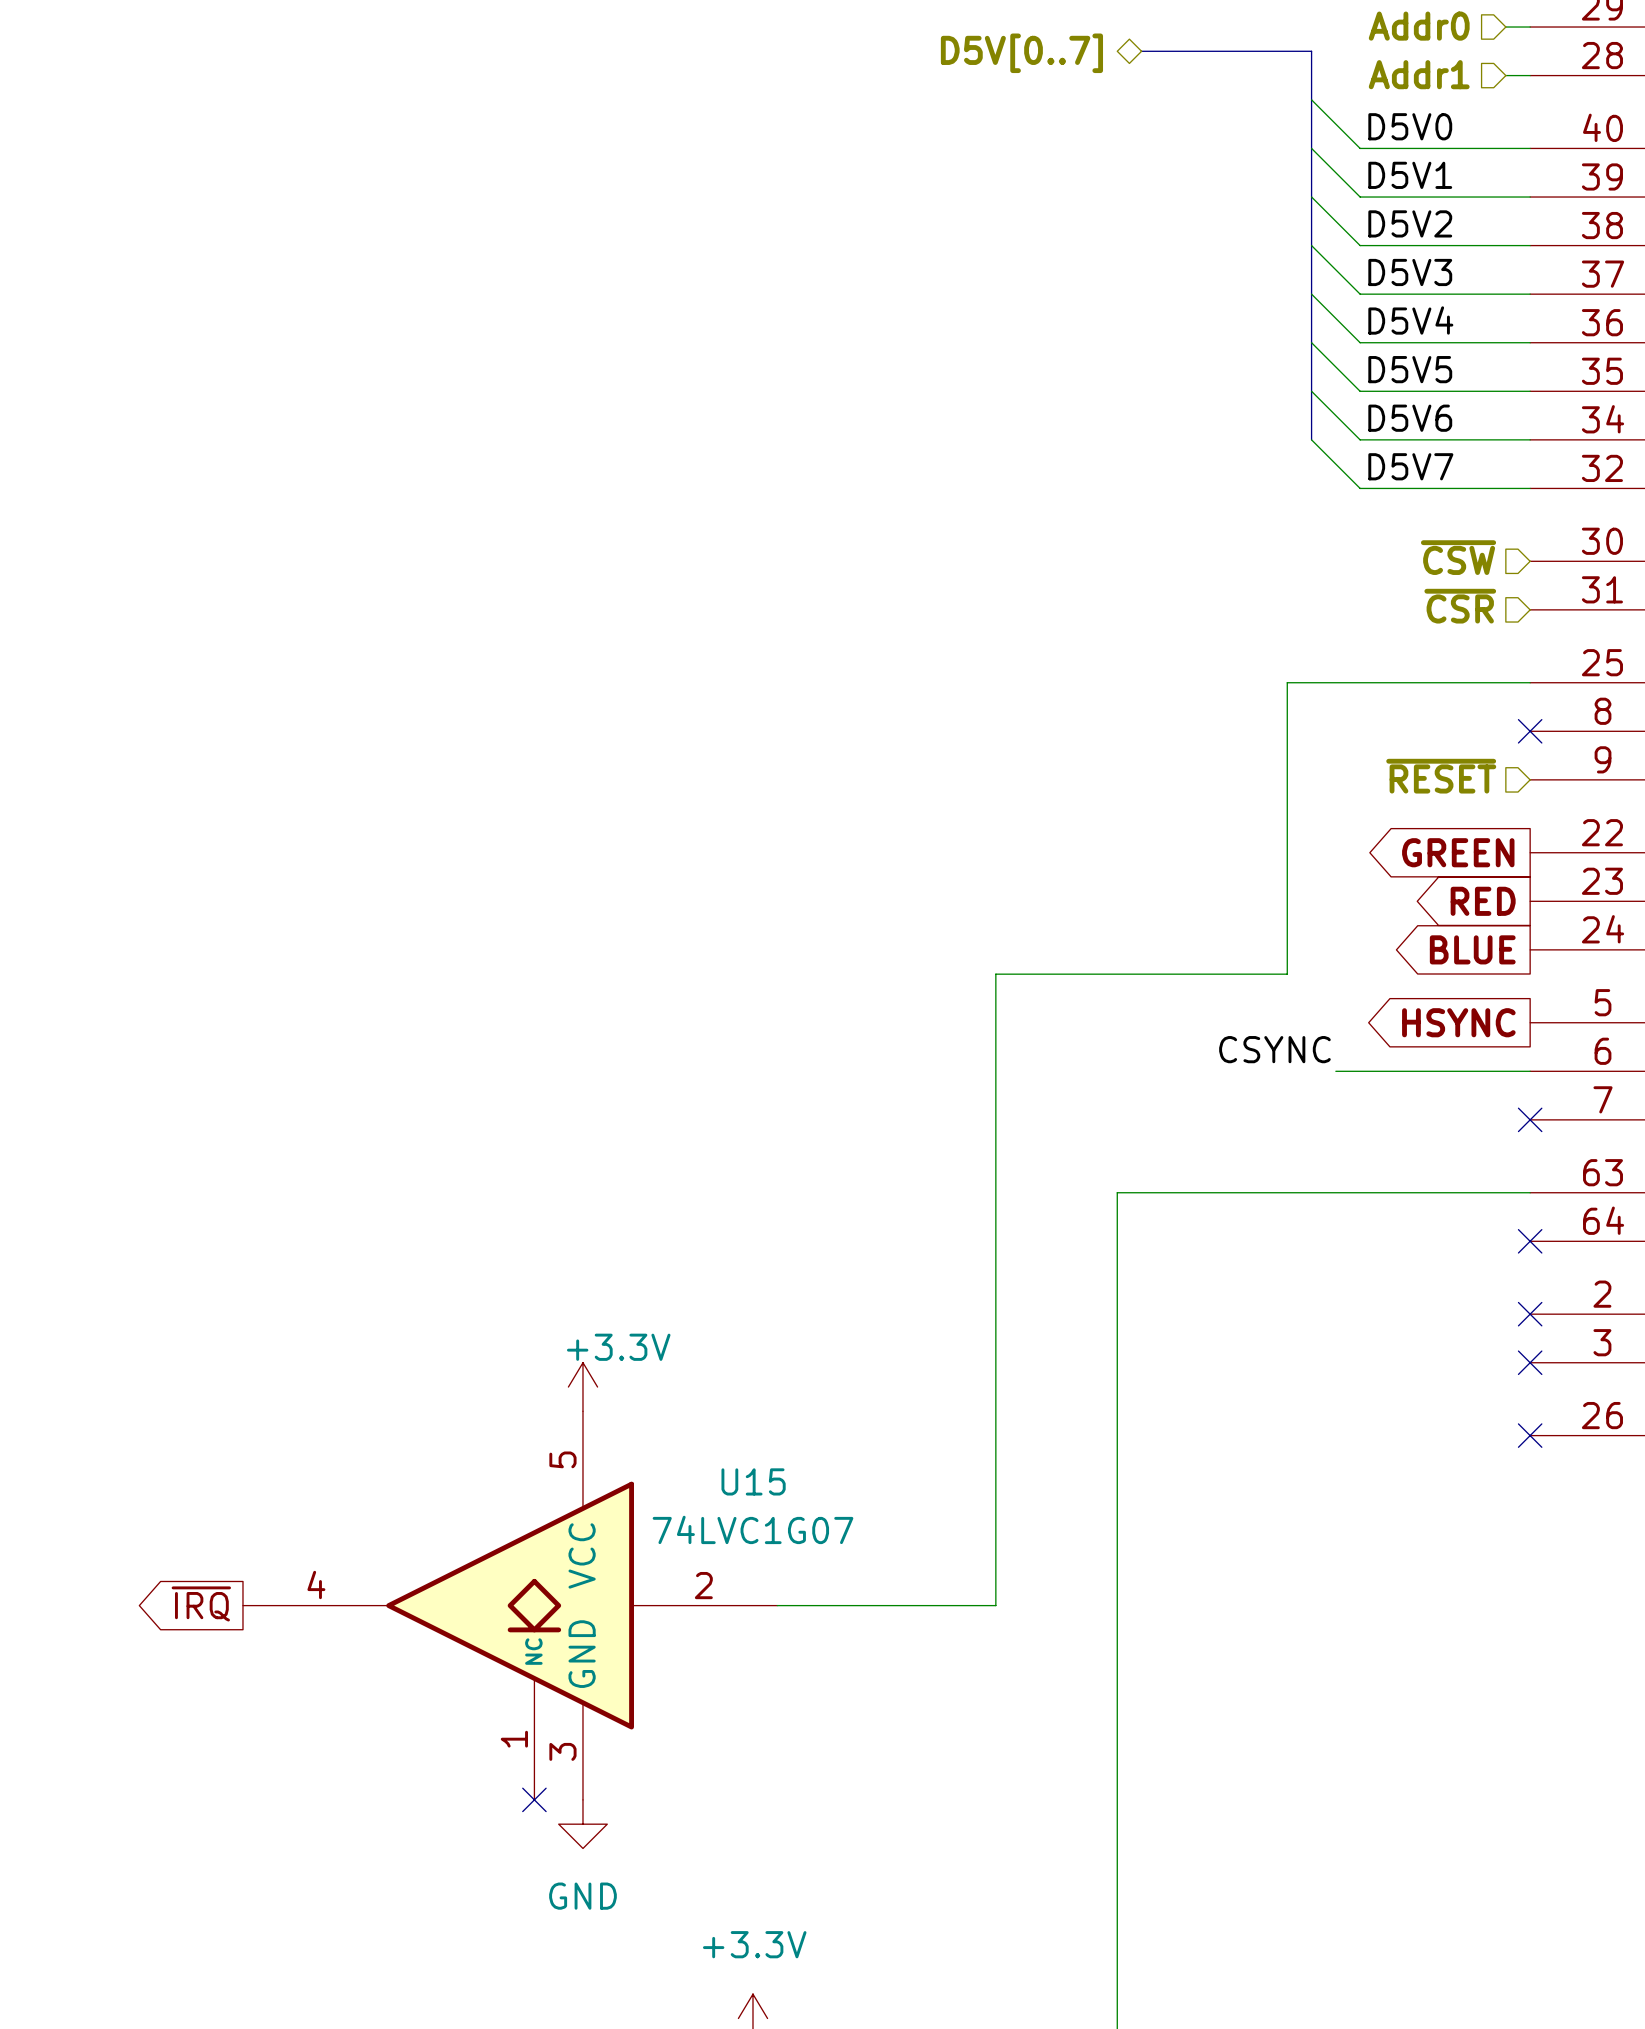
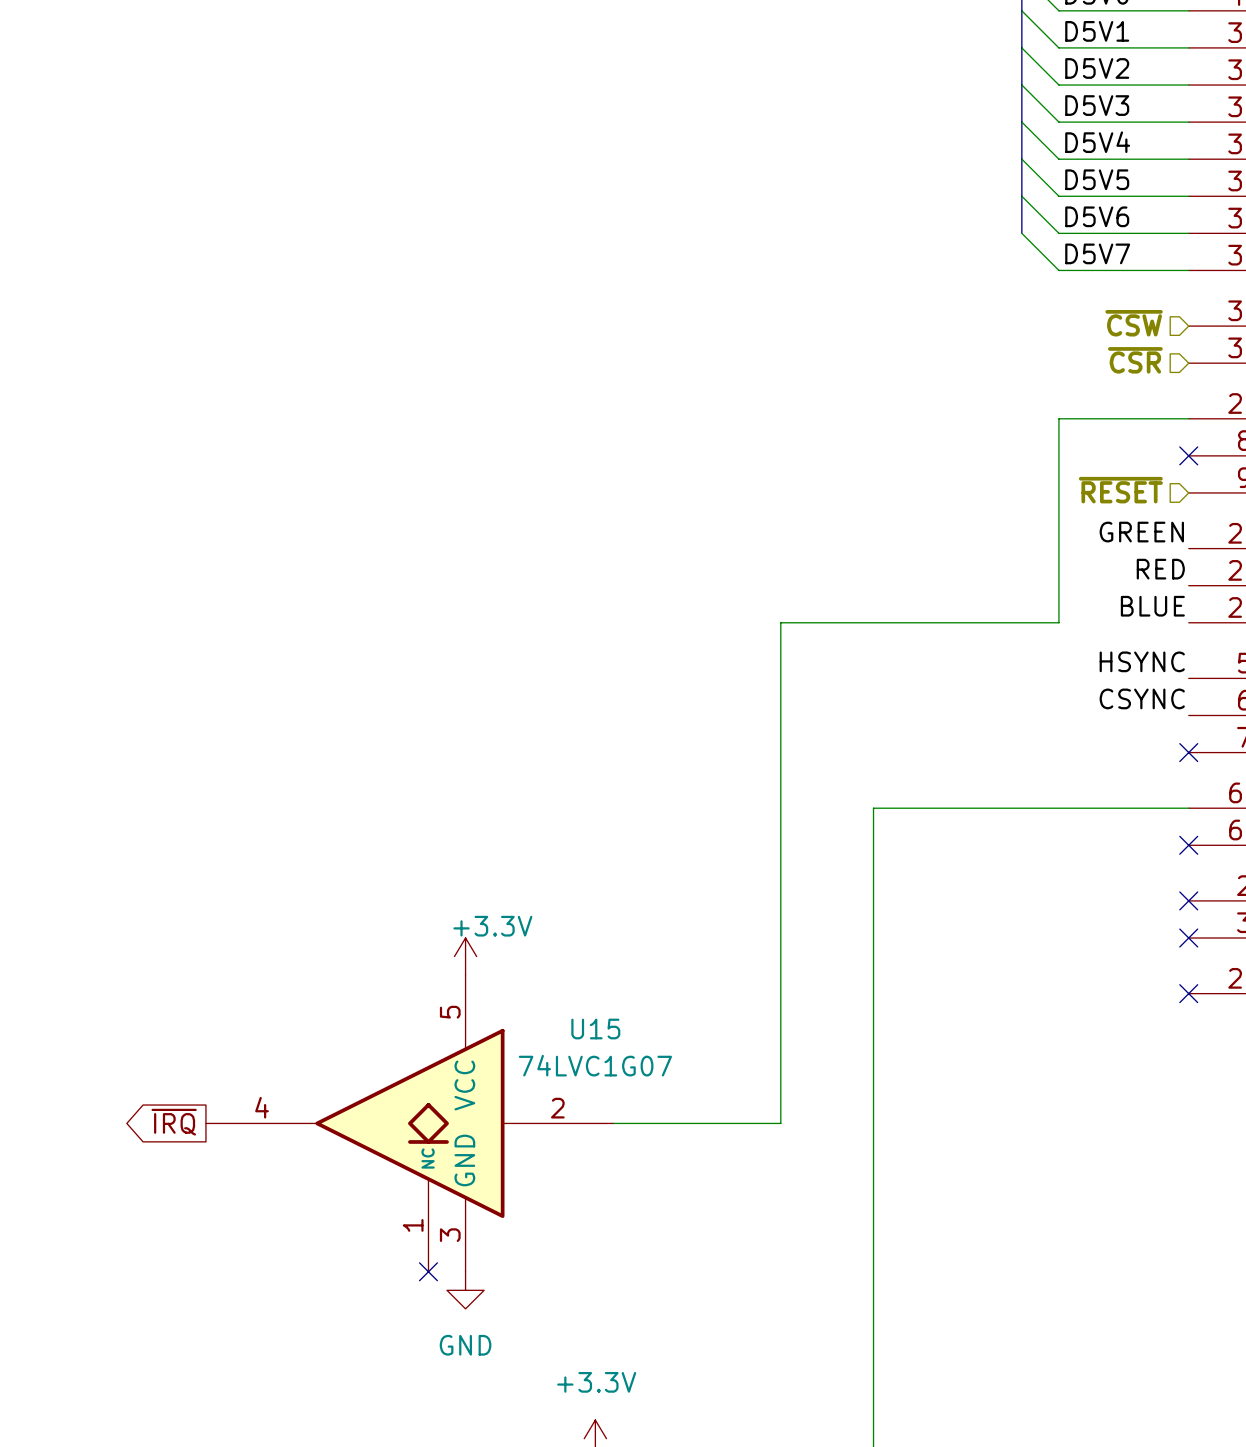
wire: (1360, 682) (1287, 682) (1287, 974) (995, 974) -> (1058, 418) (1058, 622) (780, 622) (780, 641)
label: none -> GREEN (1141, 532)
global label: GREEN (1458, 852) -> none
label: none -> RED (1160, 569)
global label: RED (1483, 901) -> none
label: none -> BLUE (1152, 606)
global label: BLUE (1472, 949) -> none
label: none -> HSYNC (1142, 661)
global label: HSYNC (1458, 1022) -> none
label position: CSYNC (1274, 1049) -> CSYNC (1142, 698)
wire: (1335, 1071) (1530, 1071) -> none

